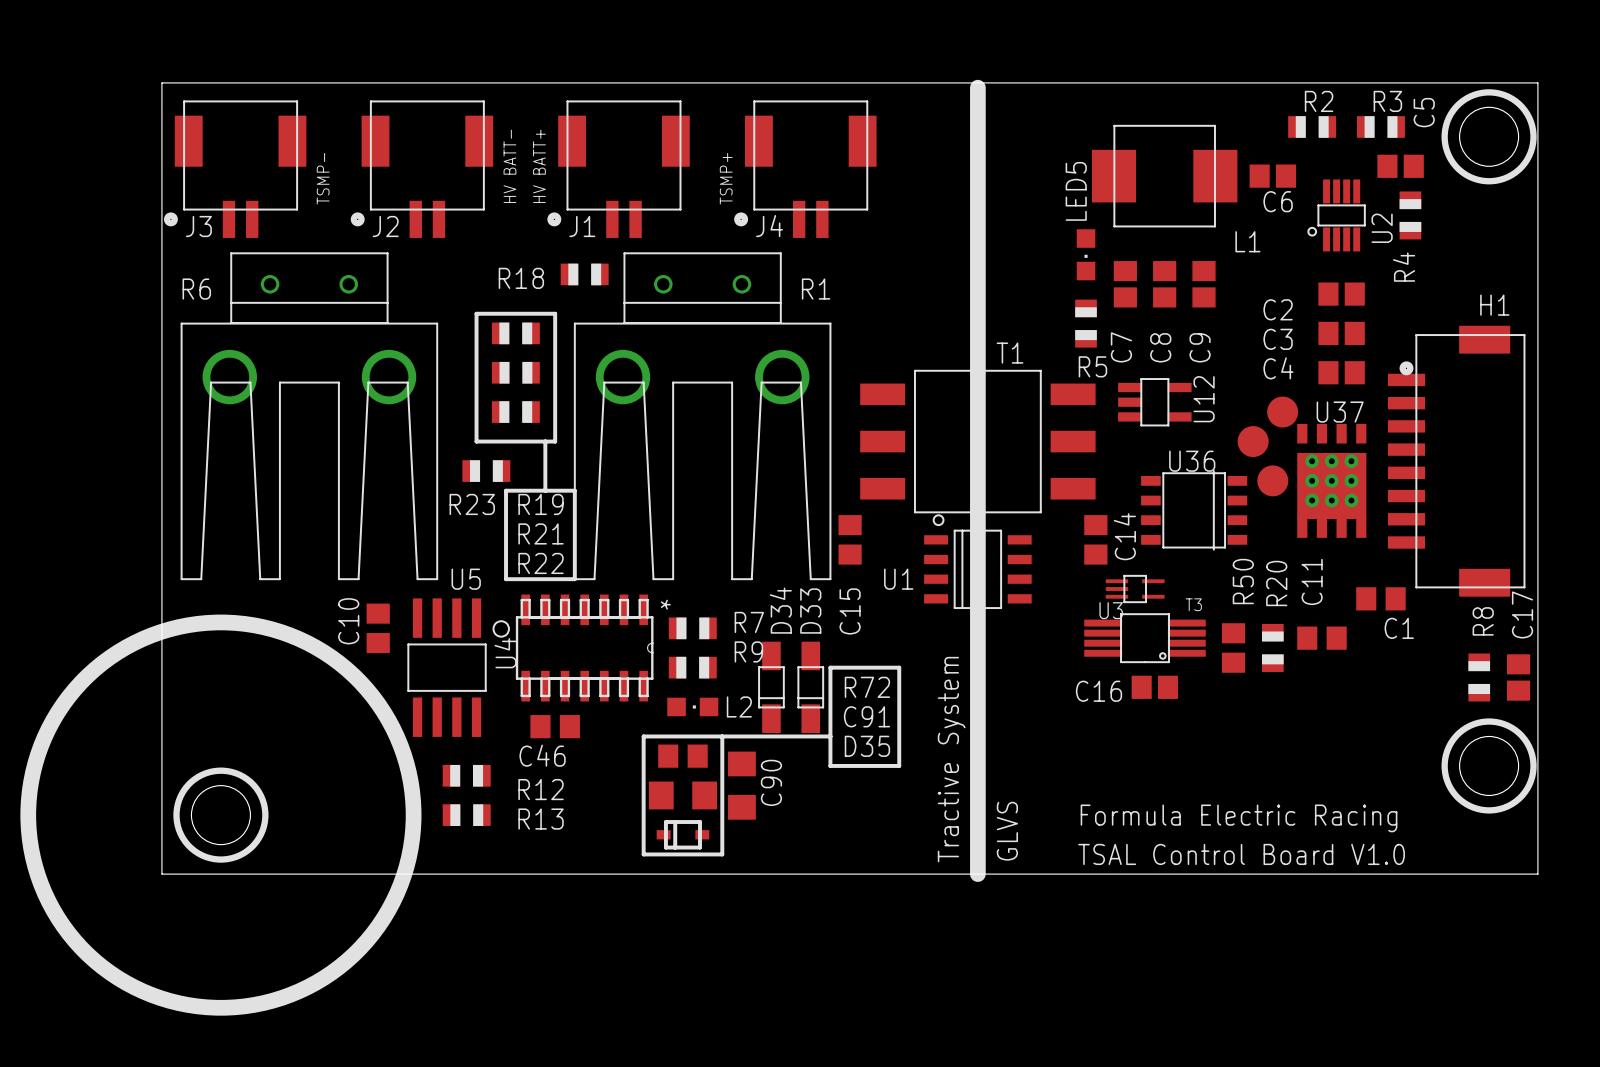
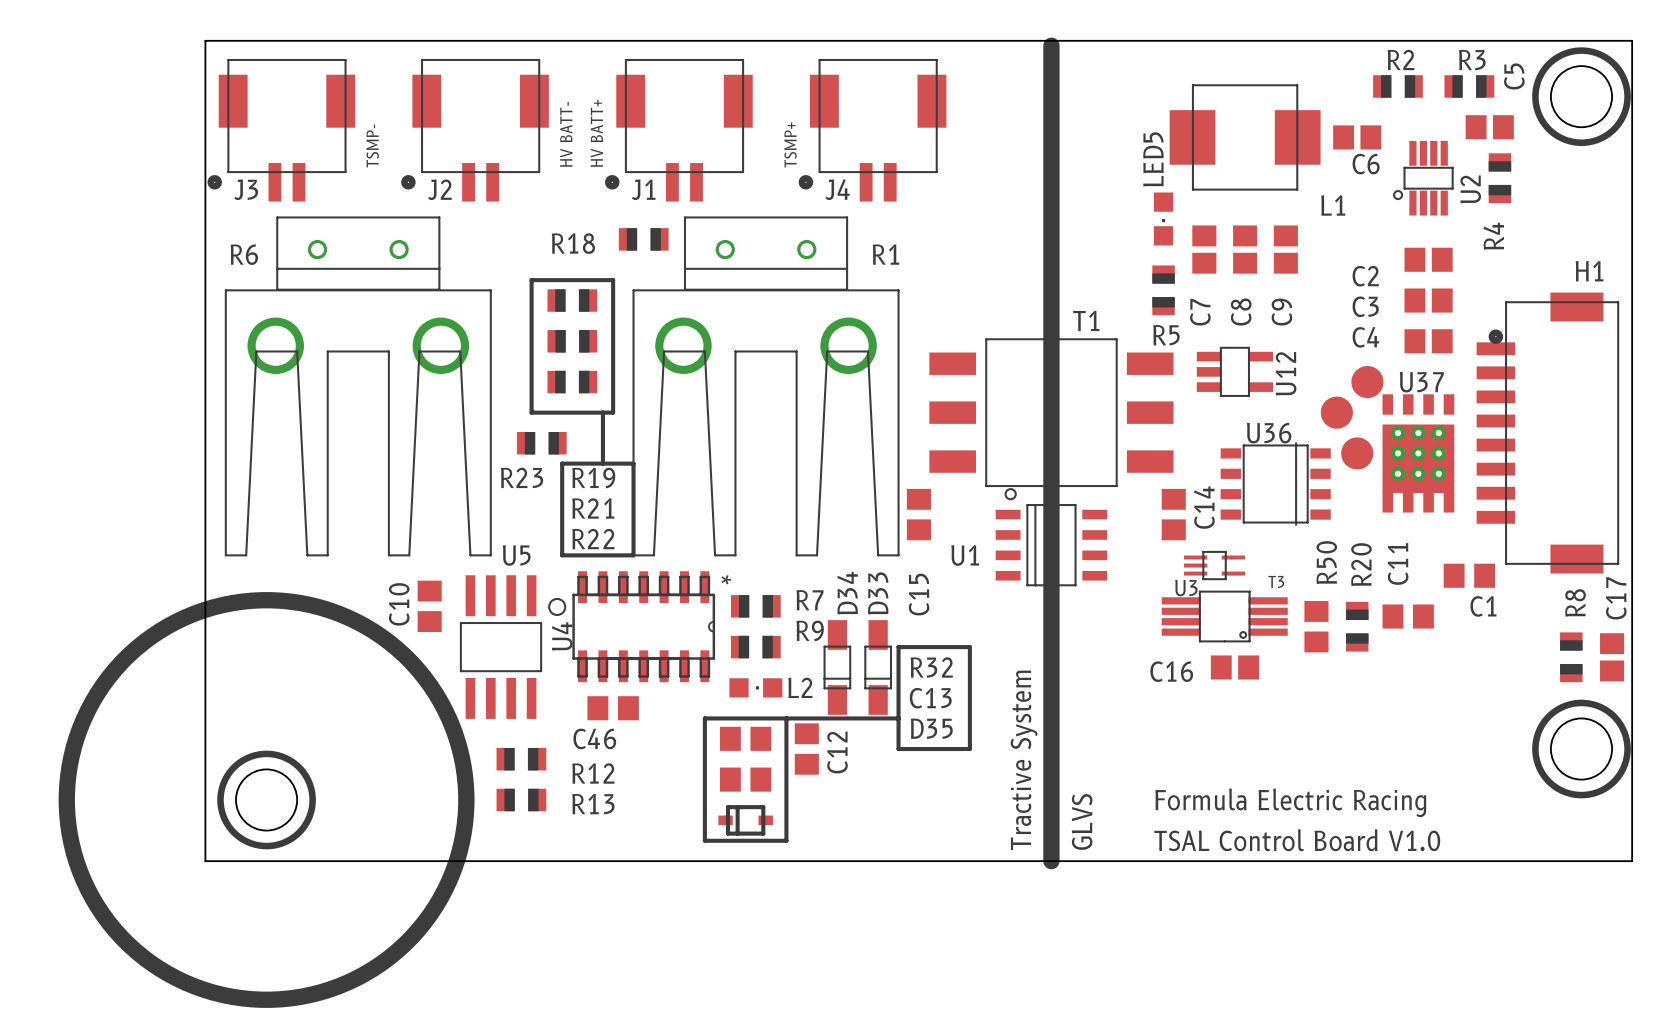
R72 name: R72 (867, 687) -> R32 (931, 667)
C12: none -> (806, 749)
C90: (741, 785) -> none
C91: (682, 795) -> none
C13: none -> (745, 779)

